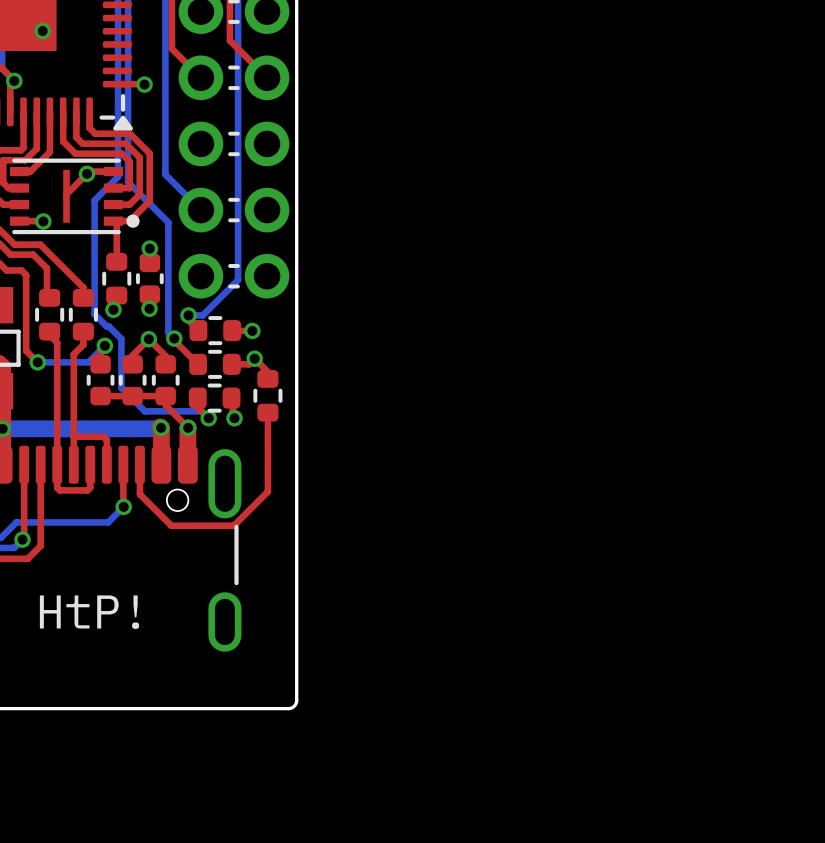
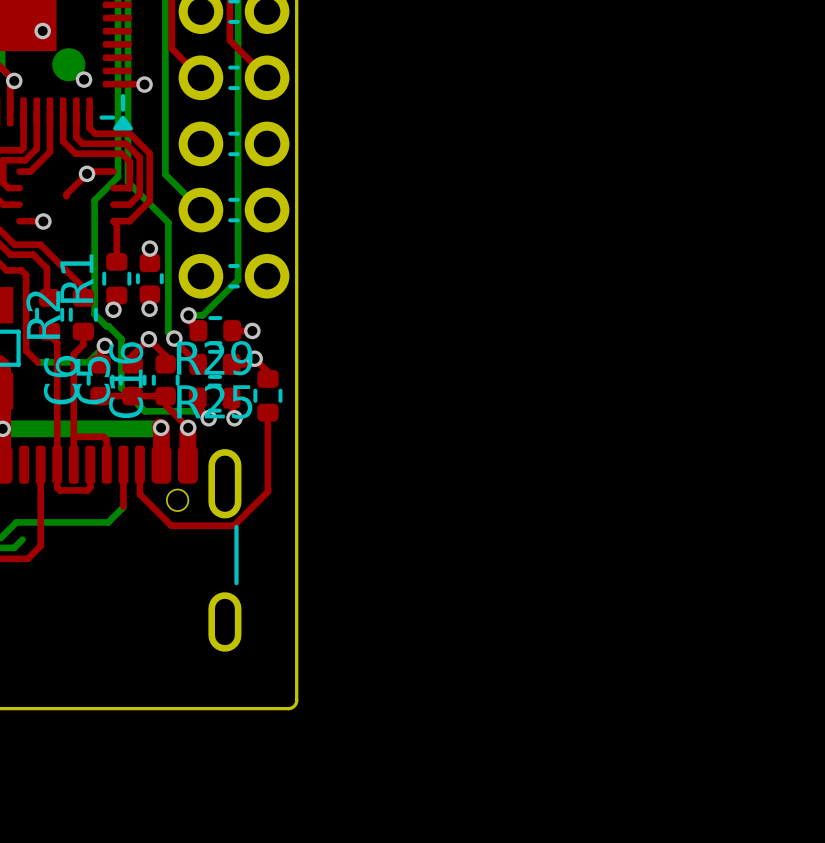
part: none -> (68, 64)
via: none -> (84, 79)
part: (74, 196) -> none
R1 name: none -> R1 (76, 278)
R2 name: none -> R2 (43, 315)
R29 name: none -> R29 (214, 358)
via: (37, 362) -> none
C6 name: none -> C6 (61, 380)
C5 name: none -> C5 (93, 380)
C16 name: none -> C16 (126, 380)
R25 name: none -> R25 (214, 401)
top track: (24, 464) (24, 537) (22, 539) -> none
via: (123, 506) -> none
via: (22, 539) -> none
text: HtP! (89, 612) -> none

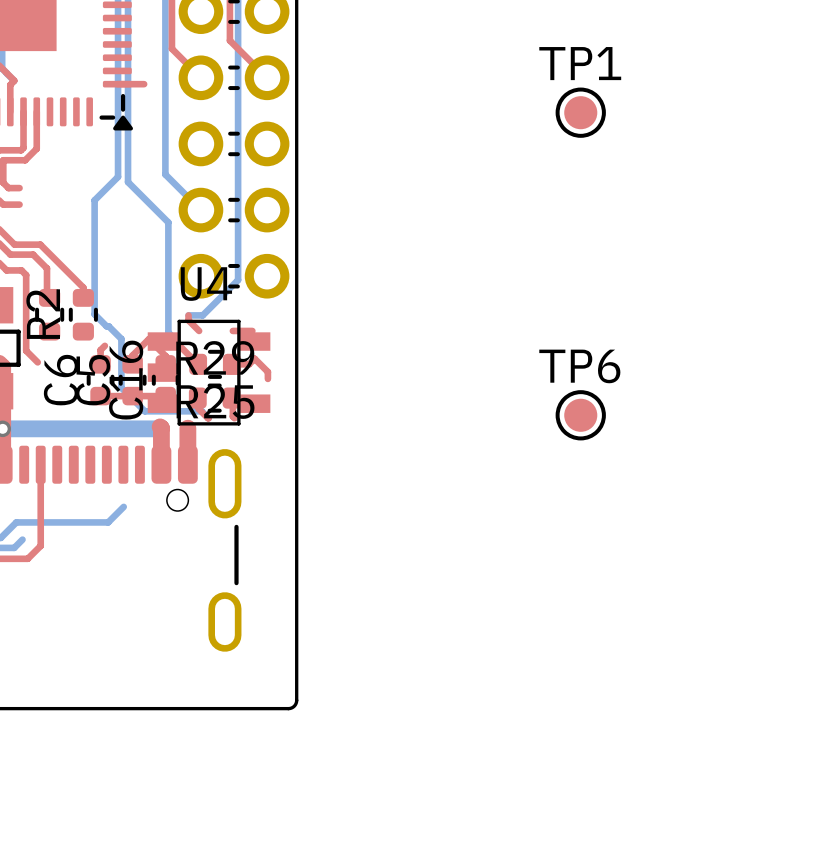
via: (42, 31) -> none
TP1 side: bottom (68, 64) -> top (580, 112)
via: (84, 79) -> none
via: (14, 80) -> none
via: (144, 84) -> none
top track: (49, 111) (49, 152) (30, 171) (19, 171) -> none
top track: (63, 111) (63, 141) (75, 153) (121, 153) (129, 161) (129, 188) (113, 188) -> none
top track: (76, 111) (76, 137) (82, 143) (125, 143) (139, 157) (139, 194) (129, 204) (113, 204) -> none
top track: (89, 111) (89, 128) (95, 133) (130, 133) (149, 153) (149, 201) (129, 221) (113, 221) -> none
top track: (113, 171) (89, 171) (66, 196) -> none
via: (87, 173) -> none
top track: (19, 221) (43, 221) -> none
via: (43, 221) -> none
top track: (113, 221) (116, 224) (116, 261) -> none
via: (149, 248) -> none
R1: (116, 278) -> none
part: (149, 278) -> none
via: (149, 308) -> none
via: (113, 309) -> none
via: (188, 315) -> none
part: (215, 330) -> none
via: (252, 330) -> none
top track: (83, 331) (83, 344) (73, 354) (73, 464) -> none
top track: (47, 332) (57, 342) (57, 487) (59, 490) (87, 490) (90, 487) (90, 464) -> none
via: (174, 338) -> none
via: (148, 339) -> none
bottom track: (104, 345) (88, 362) (37, 362) -> none
via: (104, 345) -> none
via: (254, 358) -> none
U4: none -> (209, 372)
top track: (166, 394) (166, 405) (188, 427) -> none
part: (267, 395) -> none
top track: (267, 412) (267, 491) (233, 525) (171, 525) (139, 494) (139, 464) -> none
TP6: none -> (580, 415)
via: (208, 418) -> none
via: (234, 418) -> none
via: (161, 427) -> none
via: (188, 427) -> none
top track: (73, 436) (103, 436) (106, 440) (106, 464) -> none
top track: (123, 464) (123, 506) -> none

